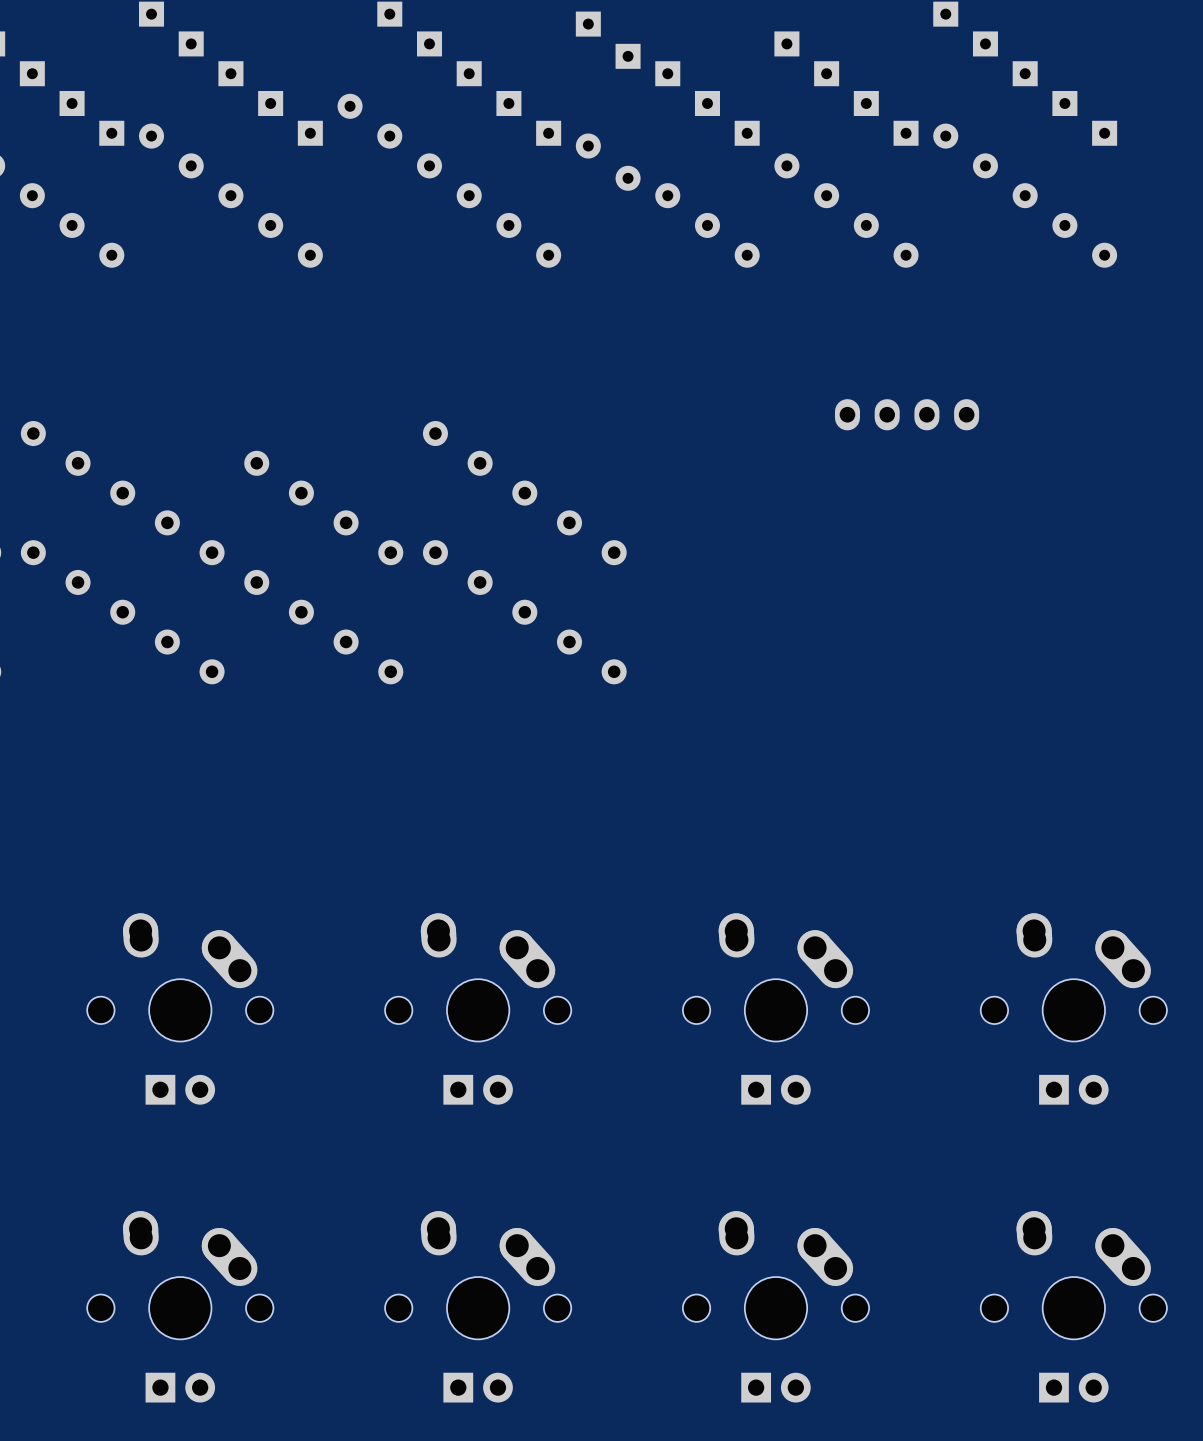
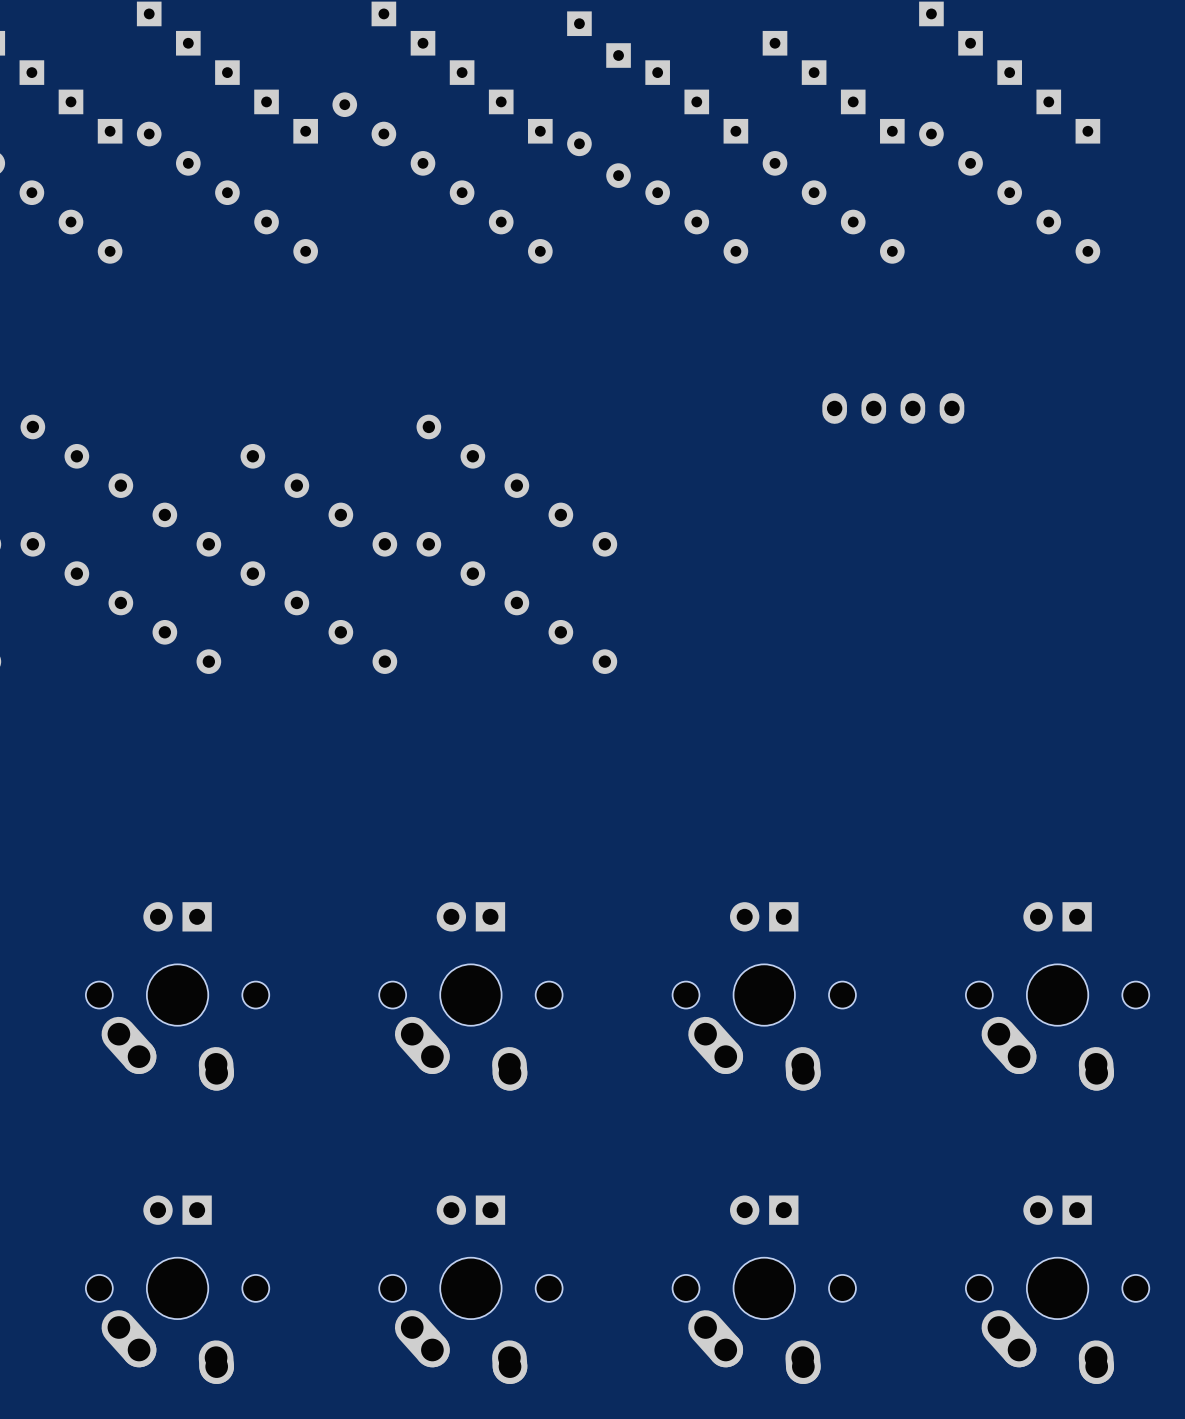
part rotation: 0° (180, 1009) -> 180° (177, 996)
part rotation: 0° (478, 1009) -> 180° (470, 996)
part rotation: 0° (775, 1009) -> 180° (764, 996)
part rotation: 0° (1073, 1009) -> 180° (1057, 996)
part rotation: 0° (180, 1306) -> 180° (177, 1289)
part rotation: 0° (478, 1306) -> 180° (470, 1289)
part rotation: 0° (775, 1306) -> 180° (764, 1289)
part rotation: 0° (1073, 1306) -> 180° (1057, 1289)

